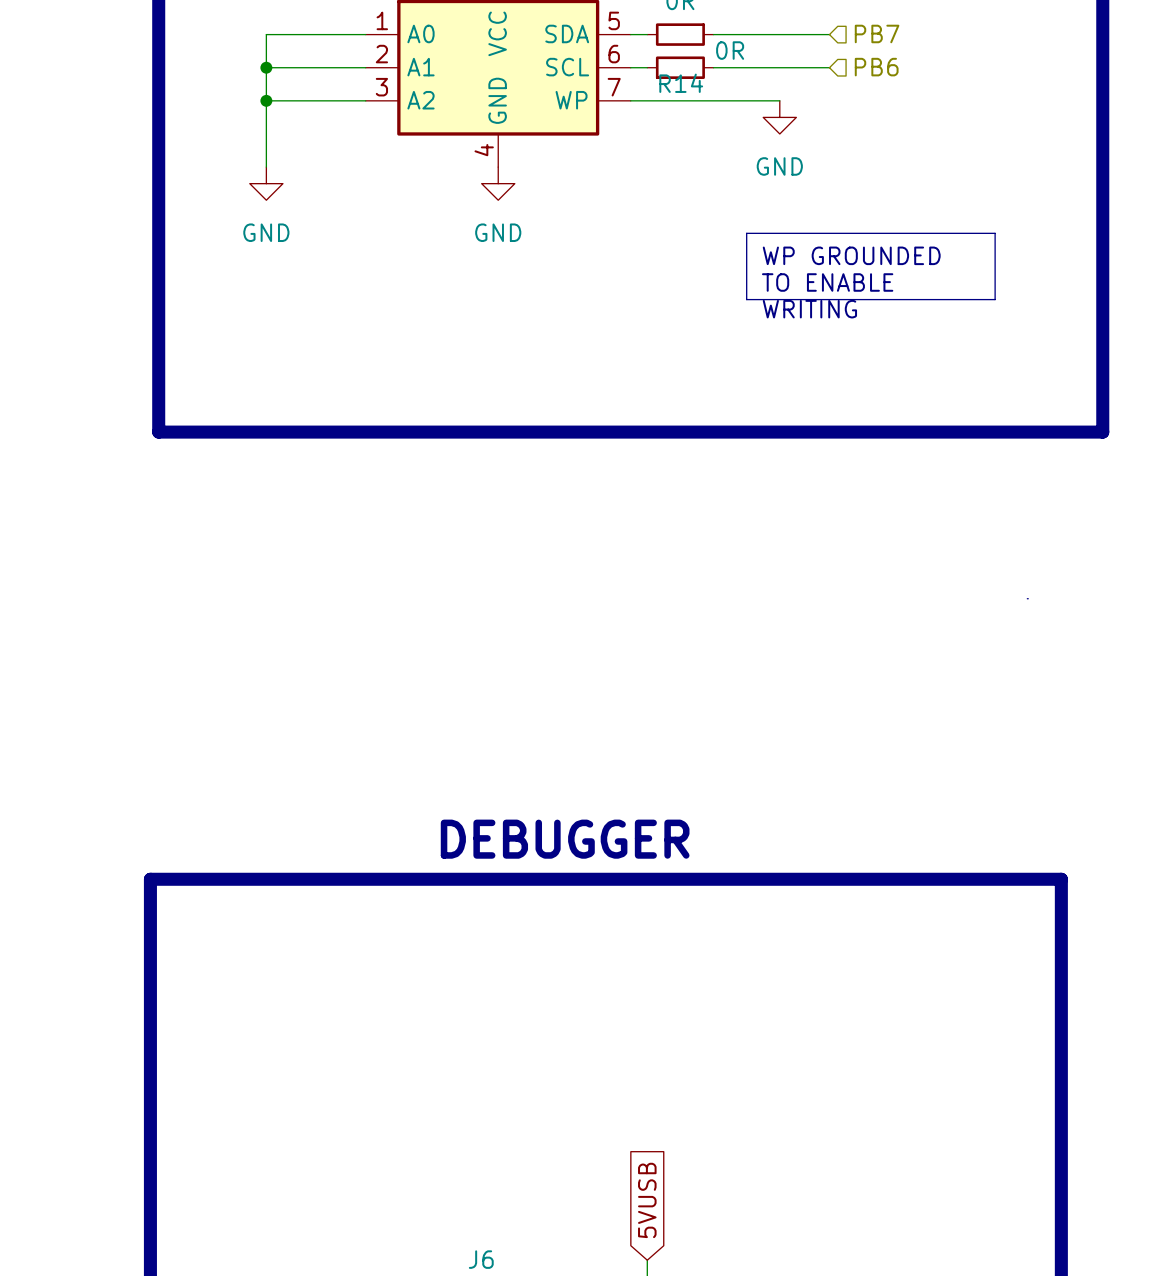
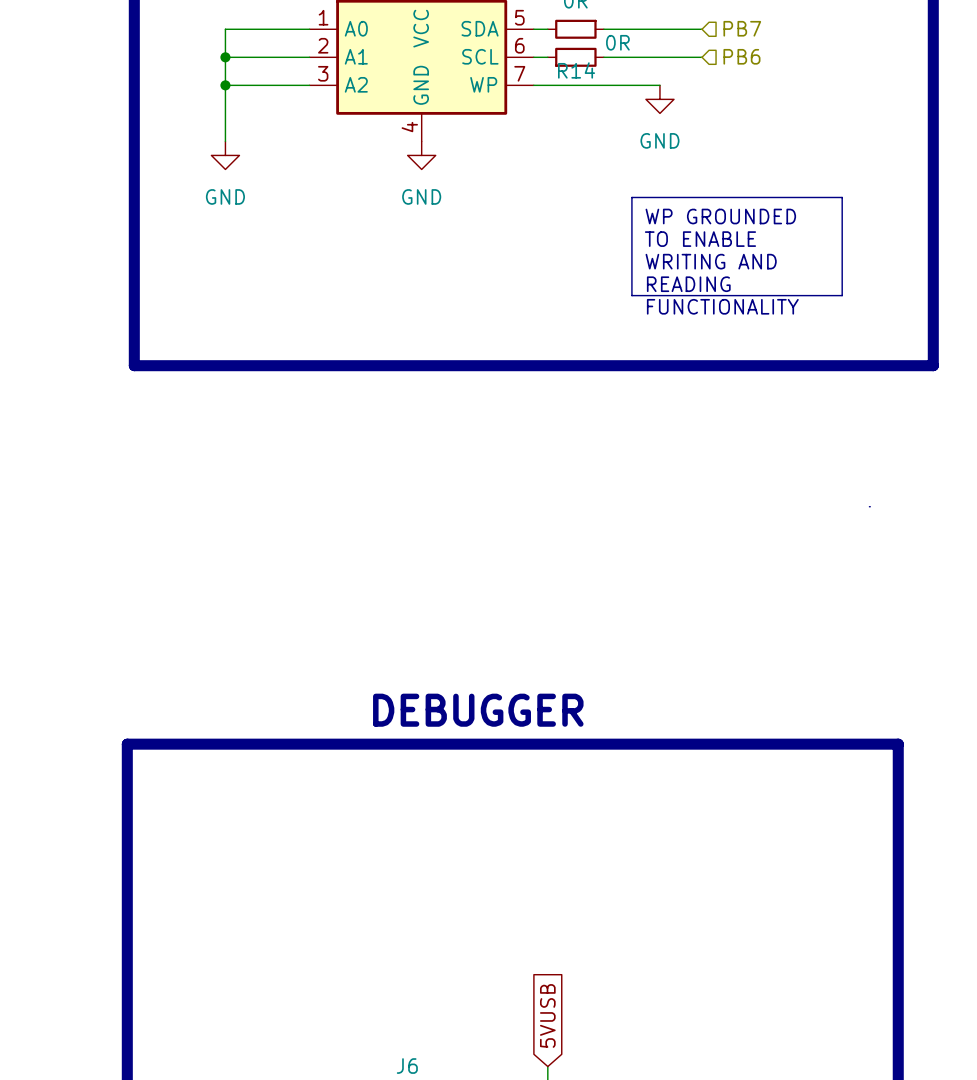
line: (746, 299) (995, 299) -> (631, 253) (631, 295) (842, 295) (842, 253)
text: WRITING (809, 309) -> WRITING AND (711, 261)
text: none -> READING (688, 284)
text: none -> FUNCTIONALITY (722, 306)

